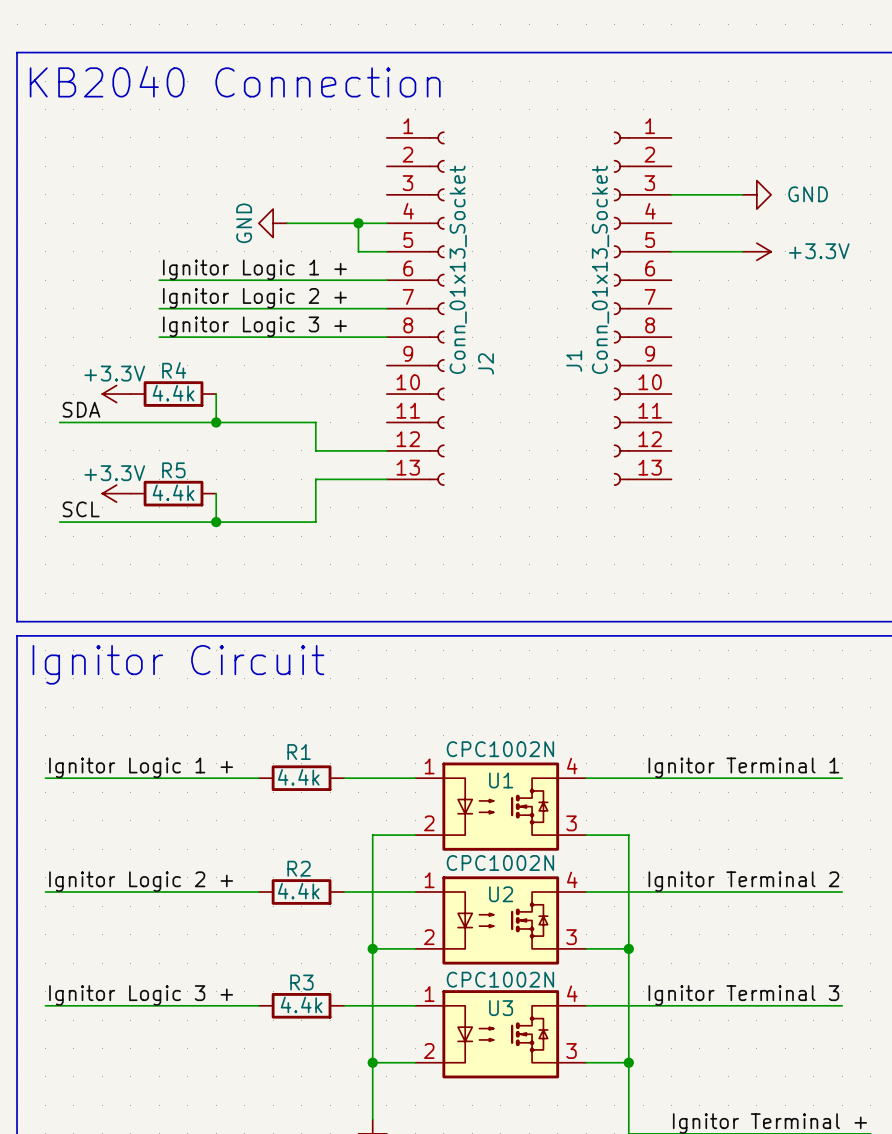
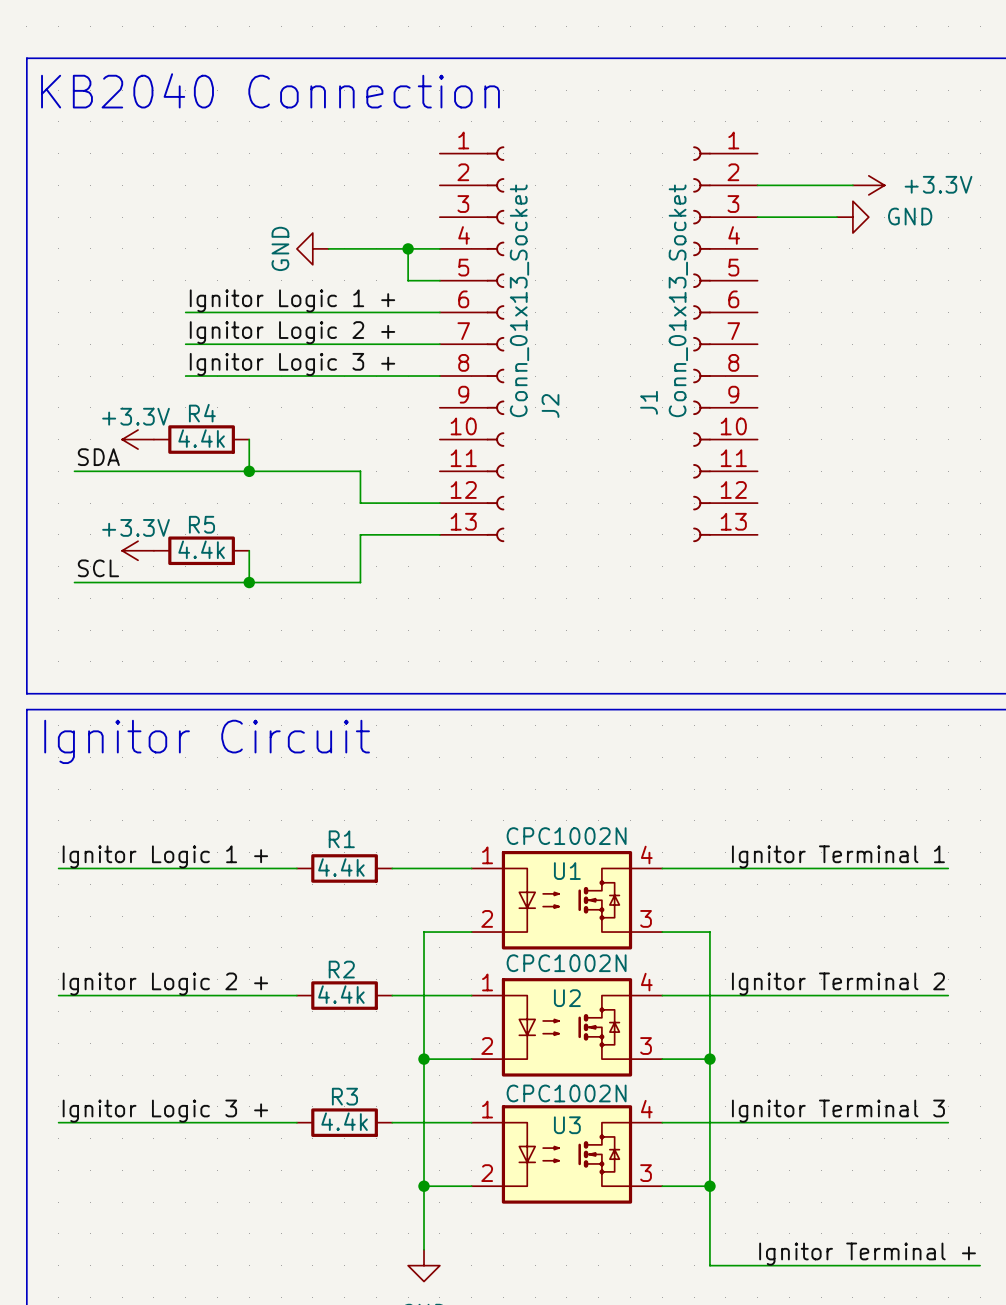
wire: none -> (757, 185) (852, 185)
wire: (671, 251) (742, 251) -> none
power symbol position: +3.3V (756, 251) -> +3.3V (868, 185)

